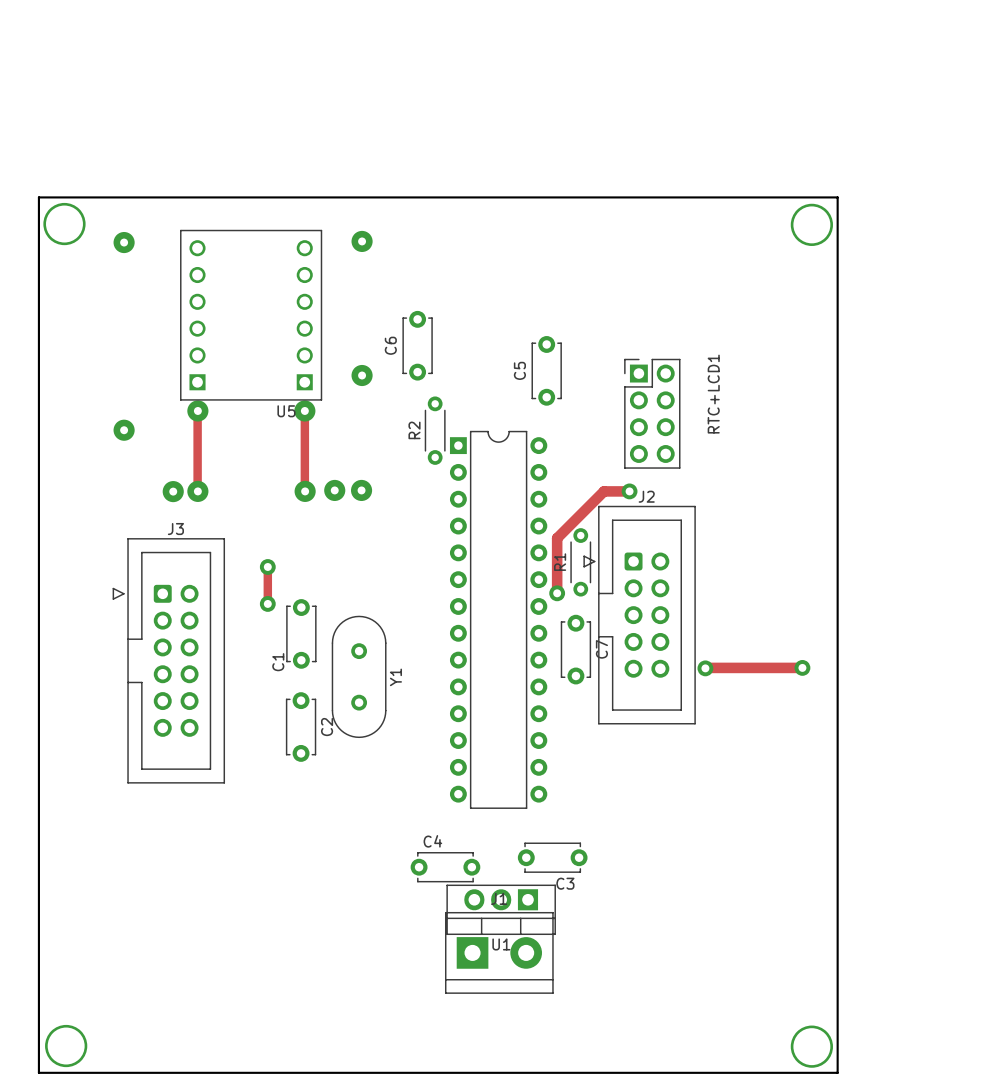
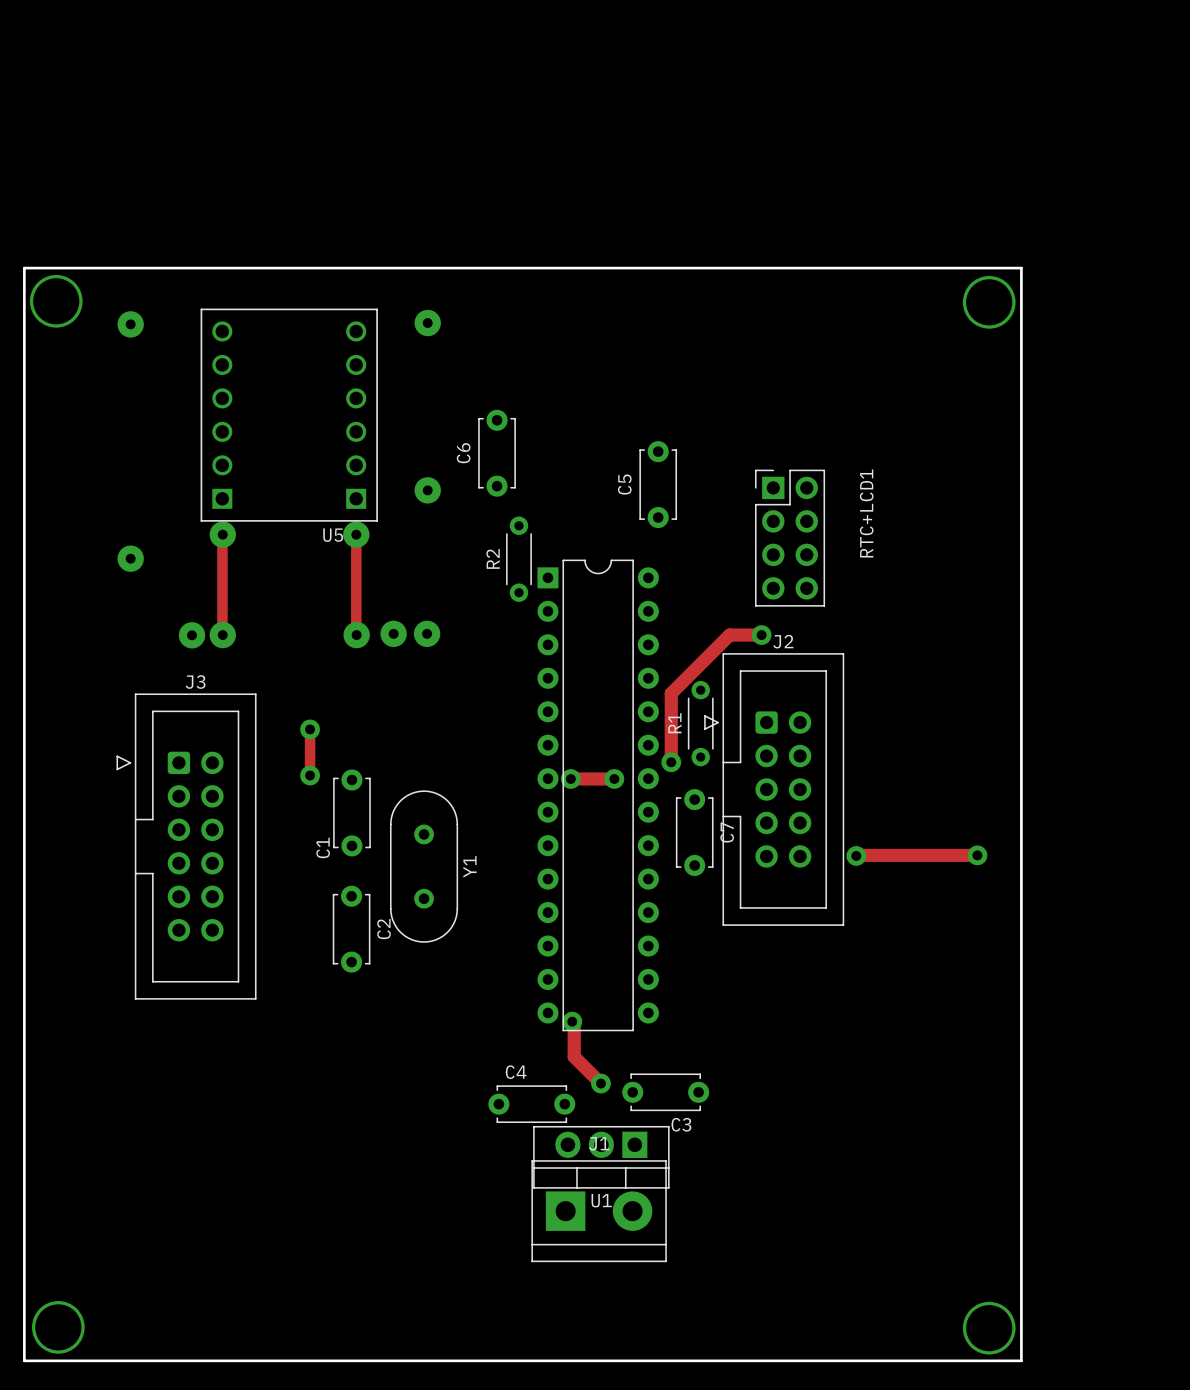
track: none -> (570, 778) (614, 778)
via: none -> (570, 778)
via: none -> (614, 778)
track: none -> (572, 1021) (574, 1023) (574, 1056) (600, 1083)
via: none -> (572, 1021)
via: none -> (600, 1083)

